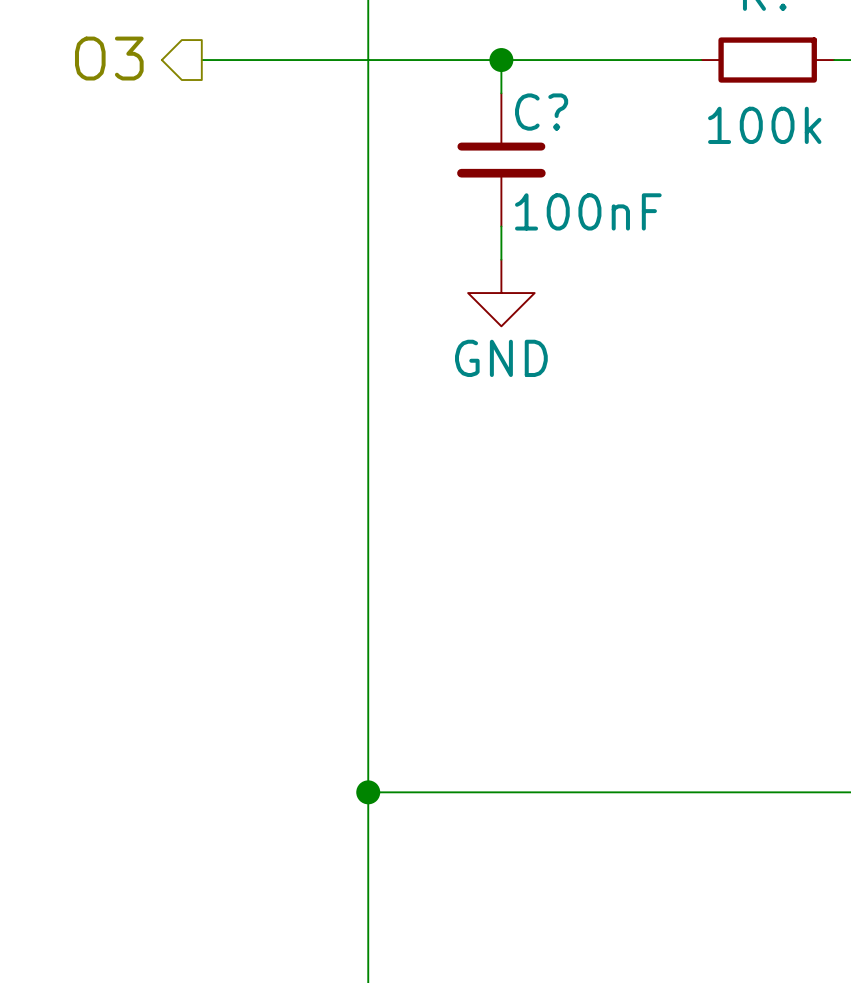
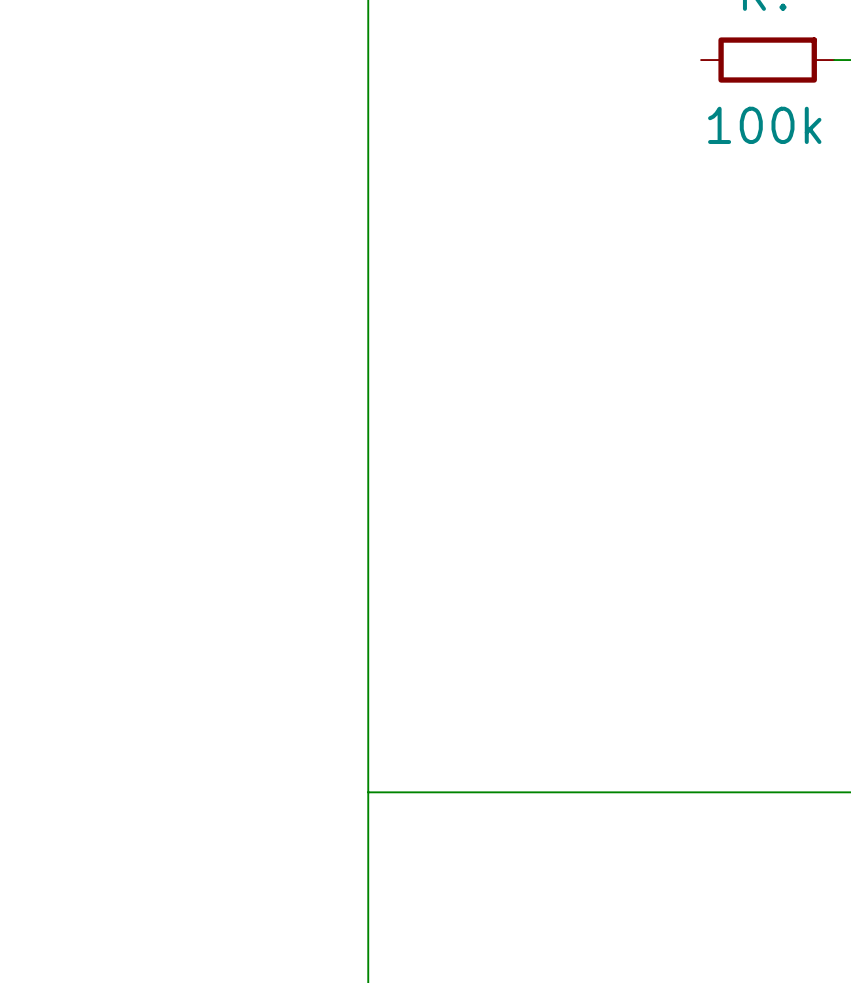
hierarchical label: O3 (109, 58) -> none
wire: (201, 60) (701, 60) -> none
wire: (501, 60) (501, 93) -> none
junction: (501, 60) -> none
C?: 100nF (501, 159) -> none
wire: (501, 226) (501, 259) -> none
power symbol: GND (501, 293) -> none
junction: (368, 792) -> none

